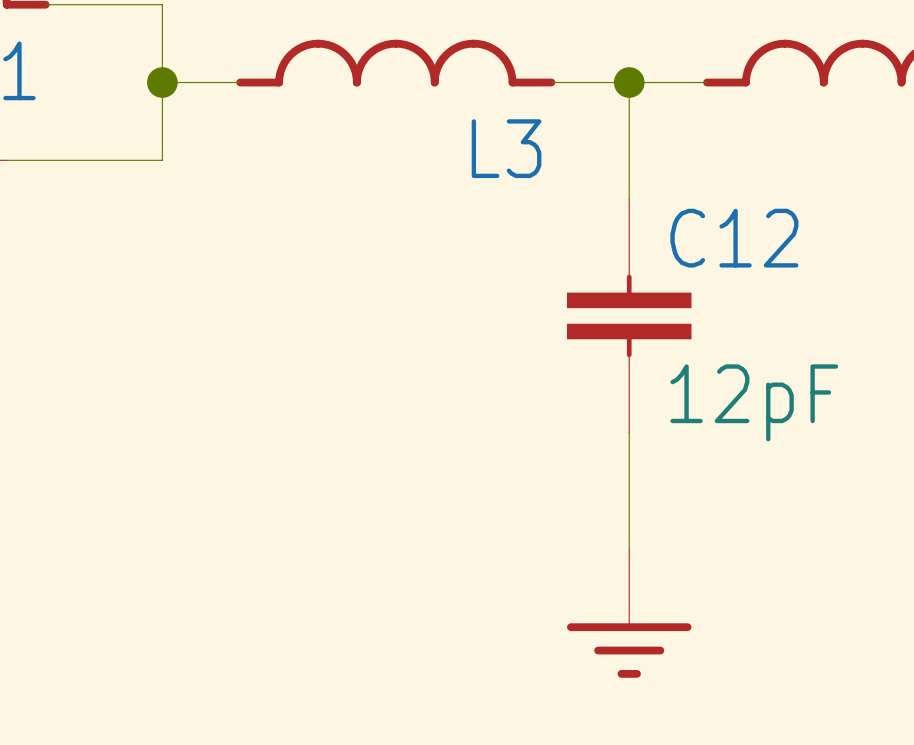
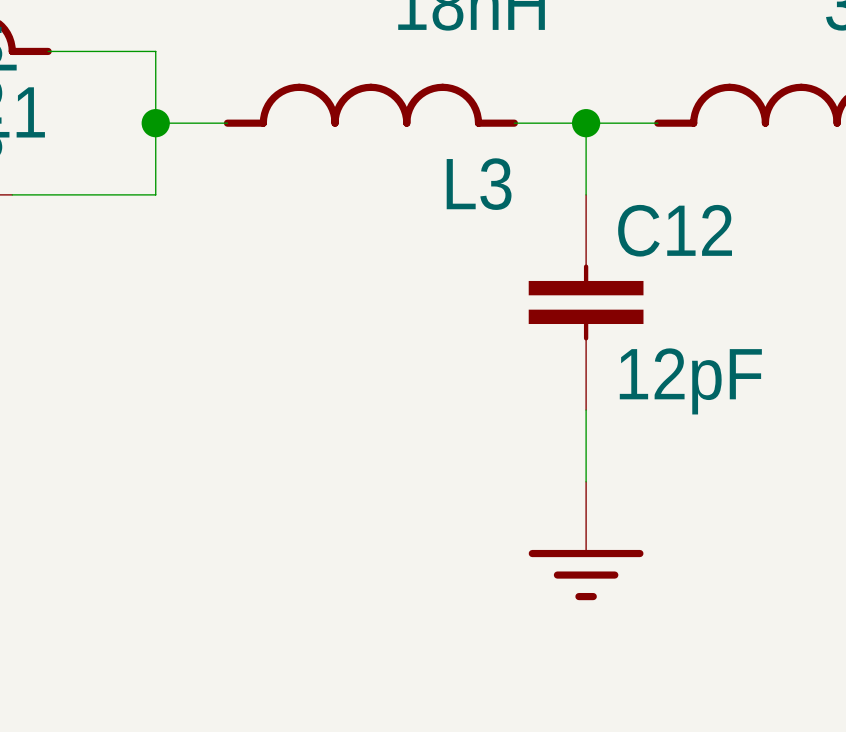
C12 position: (629, 315) -> (586, 302)
power symbol position: (629, 613) -> (586, 540)

